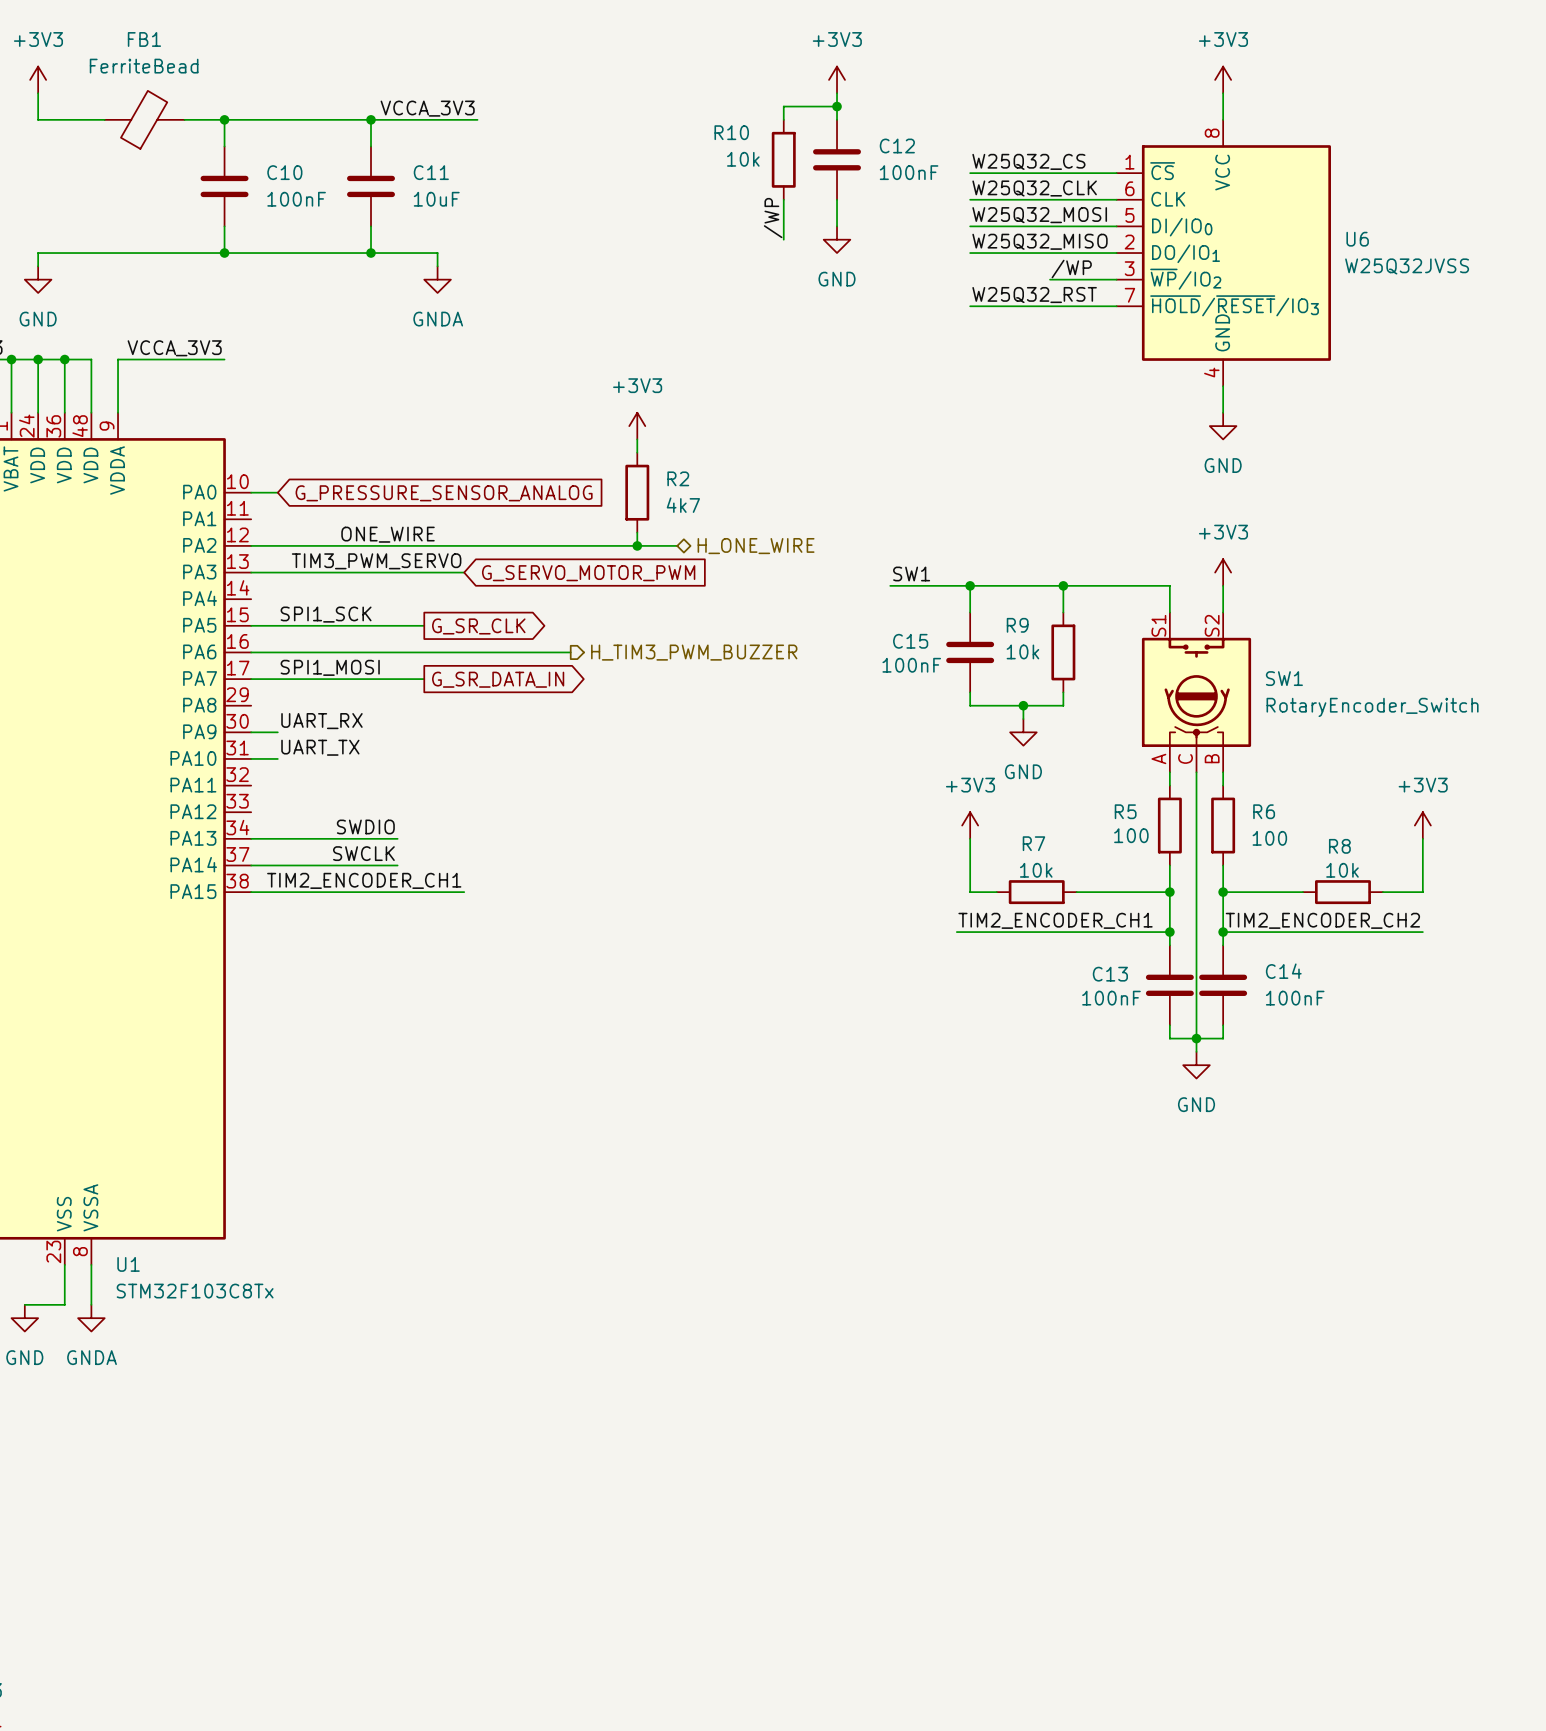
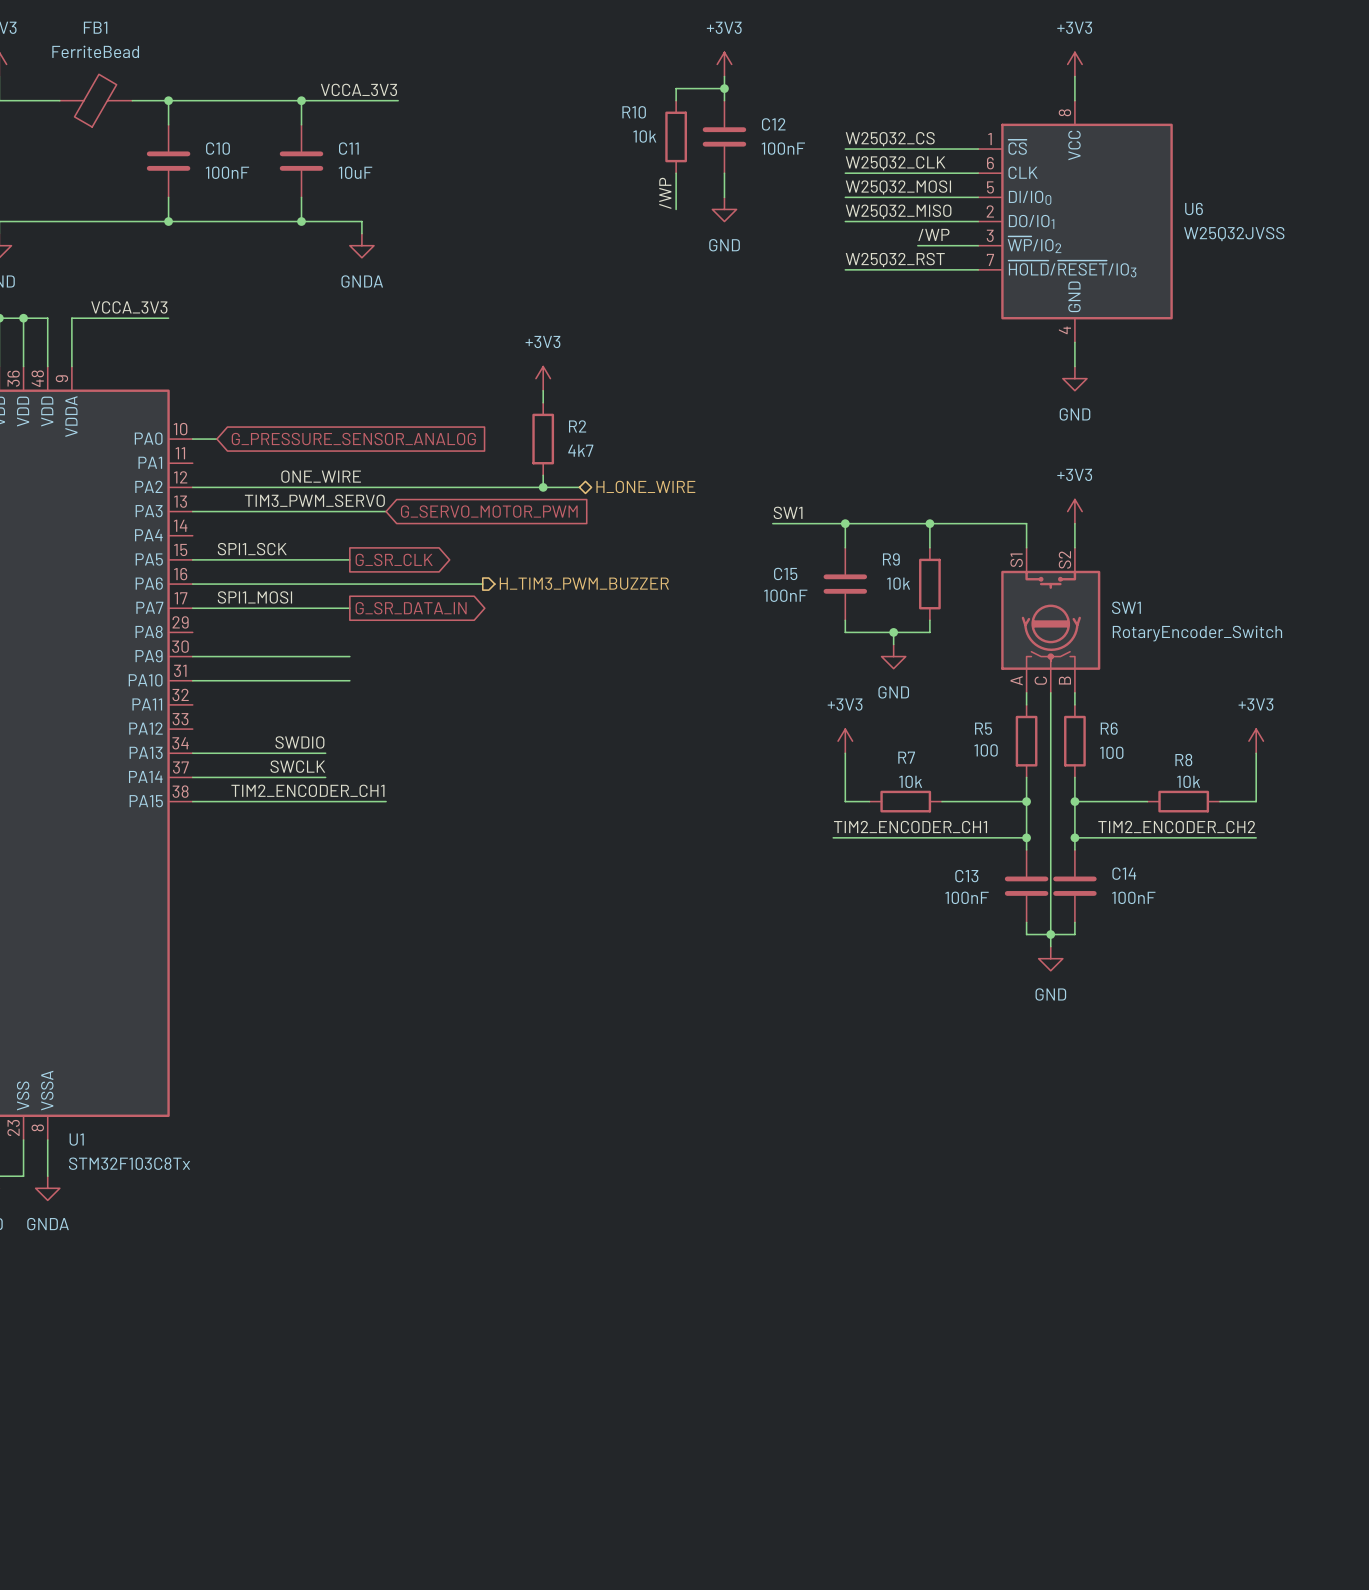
label: UART_RX (321, 721) -> none
wire: none -> (216, 656) (349, 656)
label: UART_TX (320, 747) -> none
wire: none -> (216, 680) (349, 680)

